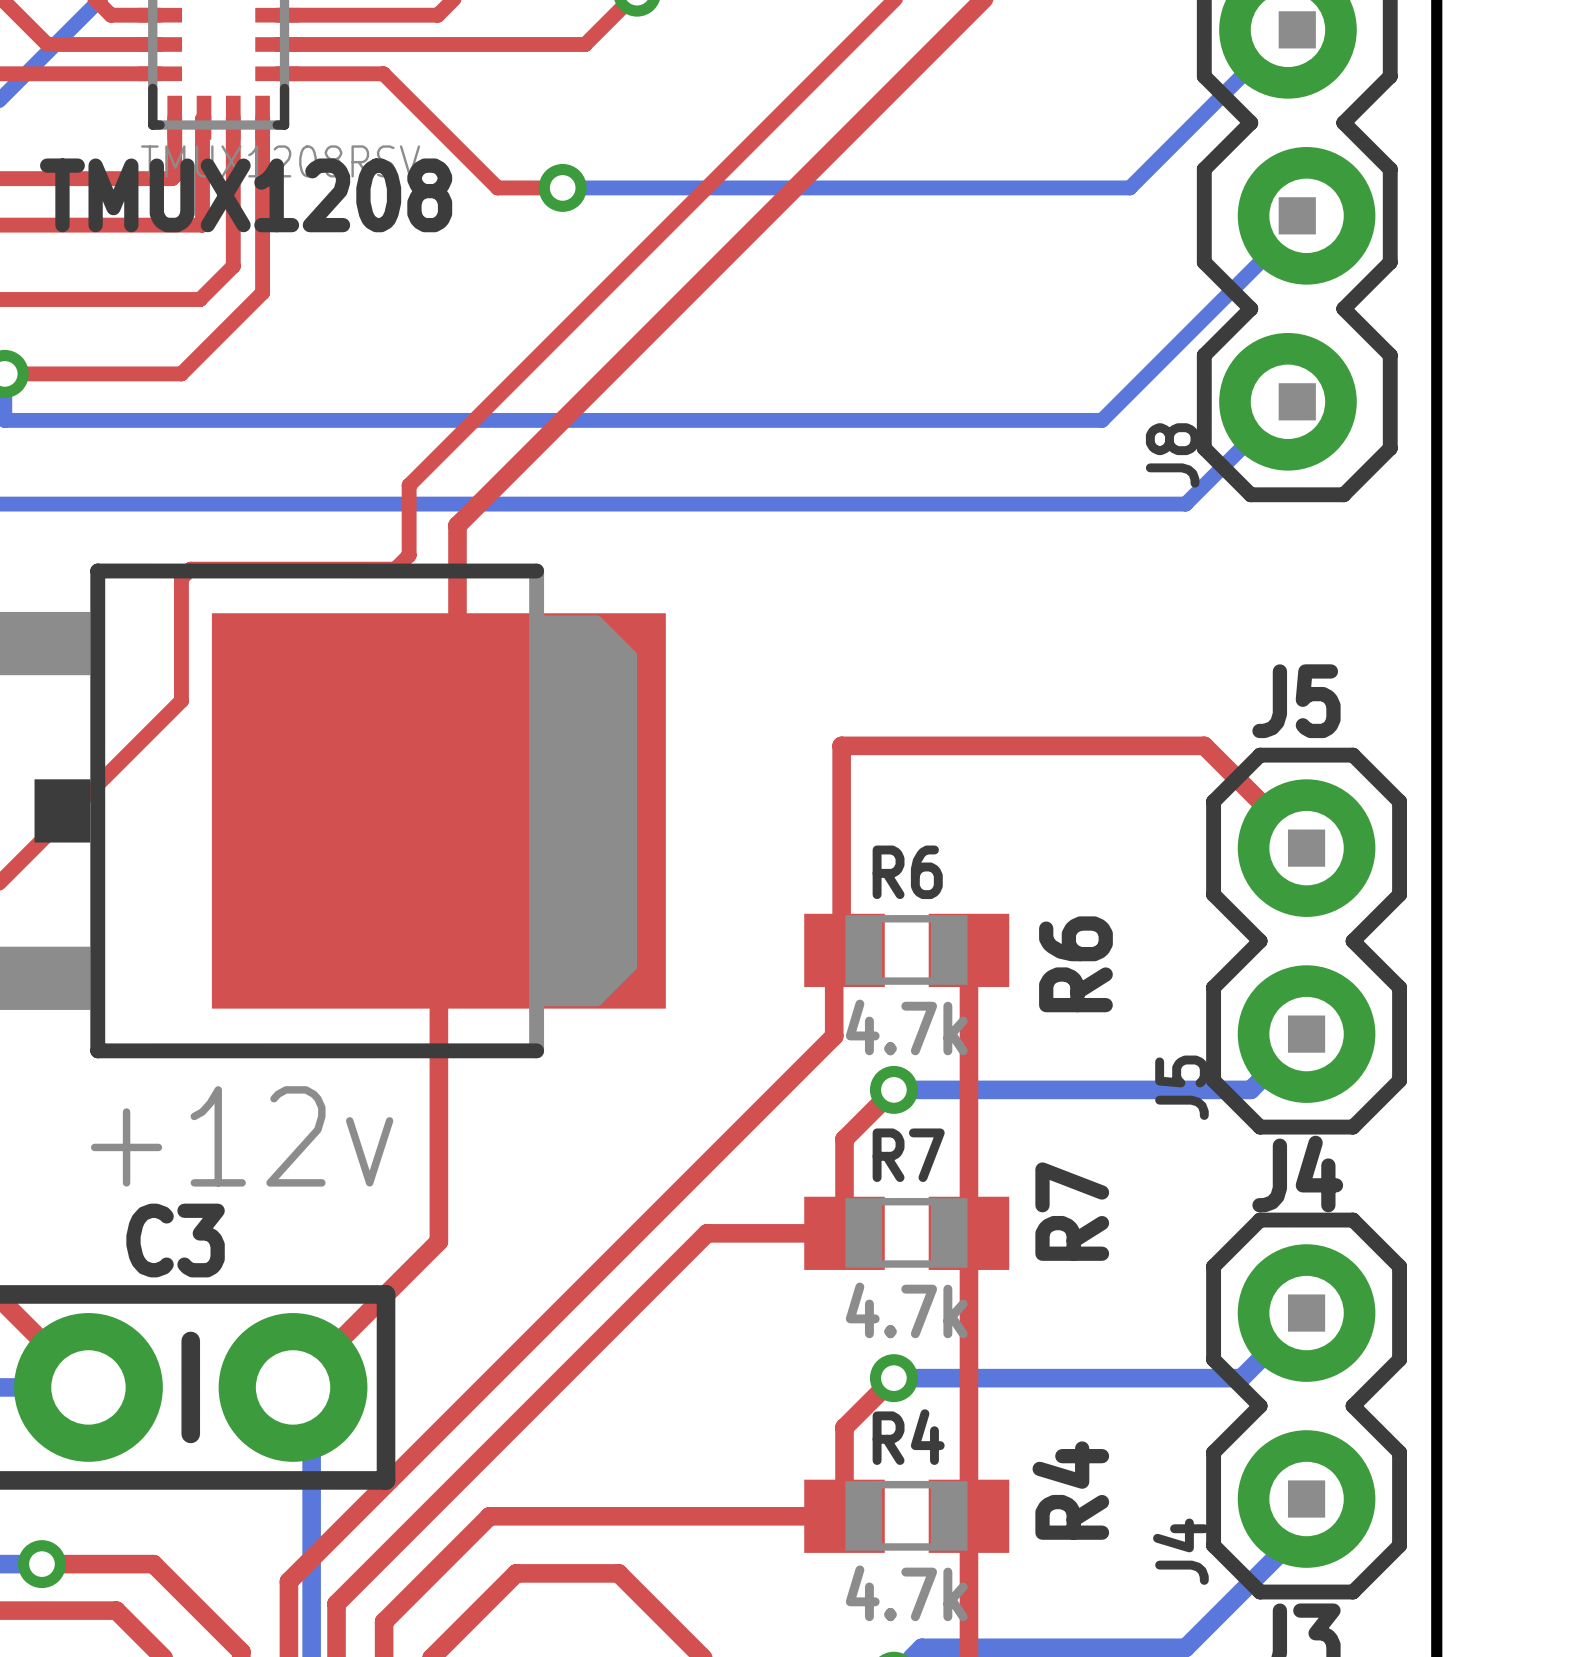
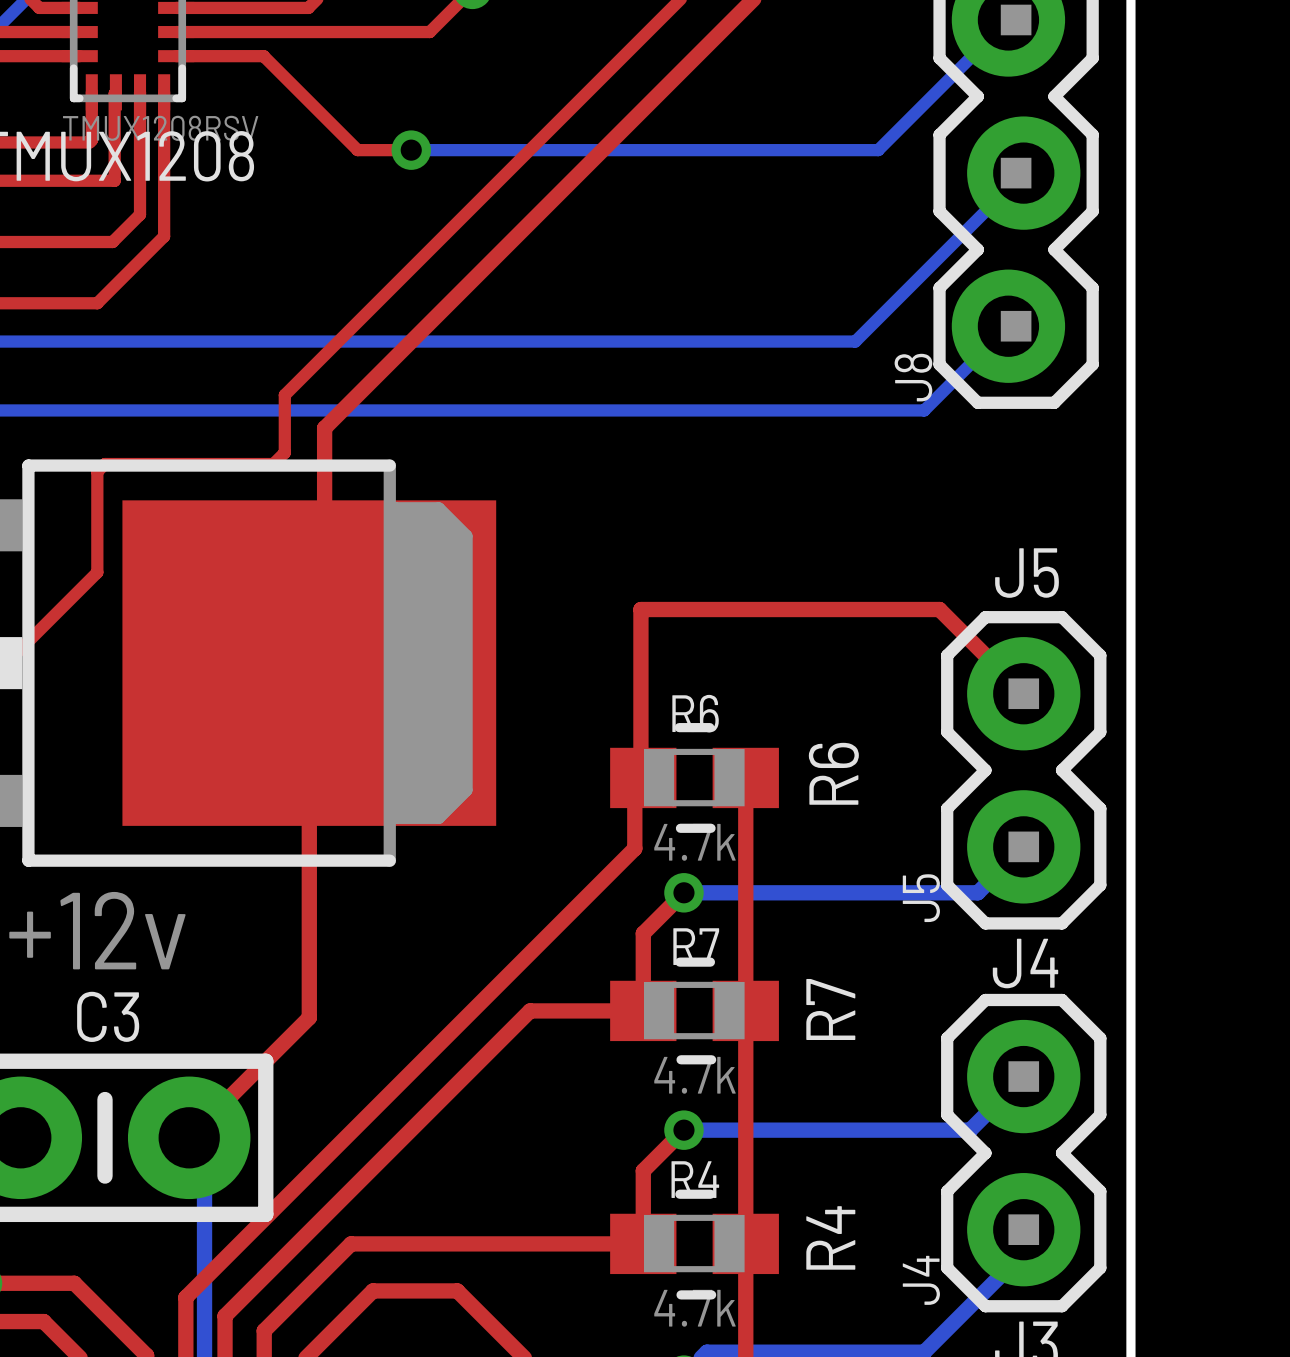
line: none -> (679, 727) (709, 727)
line: none -> (680, 828) (711, 828)
line: none -> (679, 962) (710, 962)
line: none -> (681, 1059) (711, 1059)
line: none -> (679, 1194) (710, 1194)
line: none -> (681, 1294) (711, 1294)

